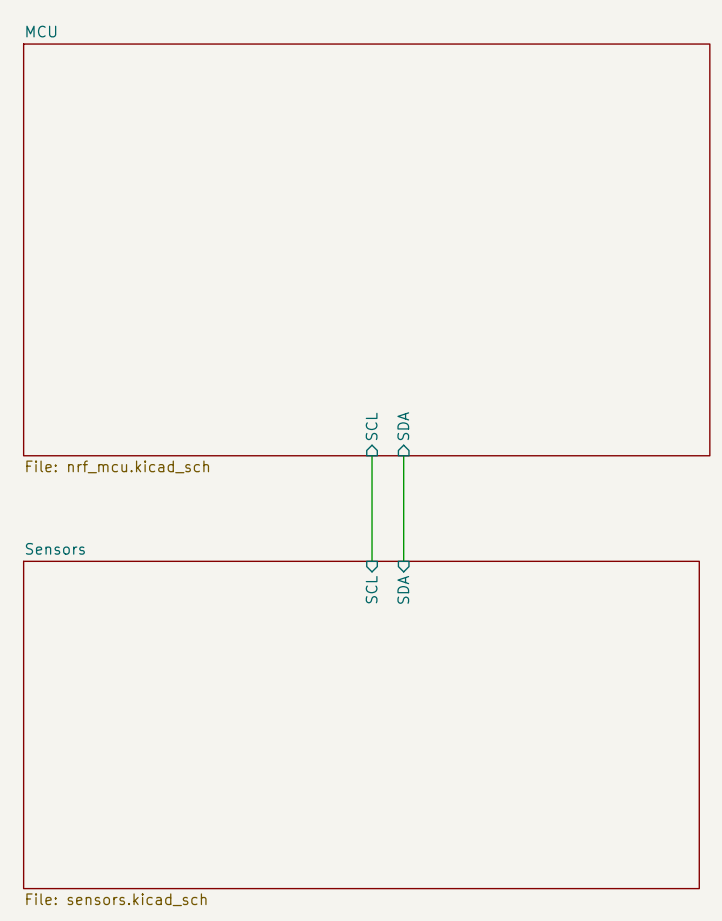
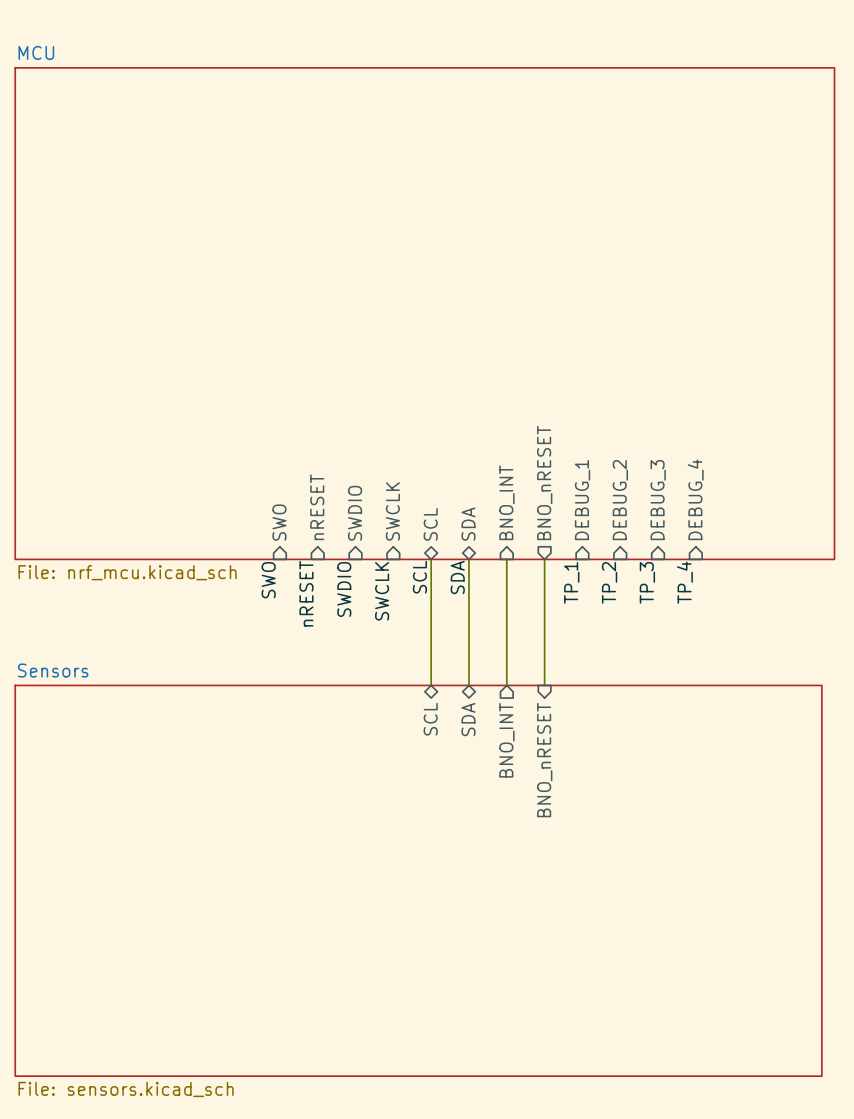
sheet pin: none -> BNO_nRESET (544, 482)
sheet pin: none -> DEBUG_4 (695, 499)
sheet pin: none -> DEBUG_1 (582, 500)
sheet pin: none -> DEBUG_2 (620, 500)
sheet pin: none -> DEBUG_3 (658, 500)
sheet pin: none -> BNO_INT (506, 502)
sheet pin: none -> nRESET (317, 507)
sheet pin: none -> SWCLK (392, 511)
sheet pin: none -> SWDIO (355, 513)
sheet pin: none -> SWO (279, 522)
sheet pin shape: input (371, 426) -> bidirectional (430, 524)
sheet pin shape: input (403, 426) -> bidirectional (468, 524)
wire: none -> (506, 559) (506, 685)
wire: none -> (544, 559) (544, 685)
label: none -> SCL (419, 577)
label: none -> SDA (457, 577)
label: none -> SWO (268, 580)
label: none -> TP_1 (571, 582)
label: none -> TP_2 (609, 582)
label: none -> TP_3 (647, 582)
label: none -> TP_4 (684, 582)
label: none -> SWDIO (344, 589)
label: none -> SWCLK (382, 591)
label: none -> nRESET (306, 593)
sheet pin shape: input (371, 589) -> bidirectional (430, 719)
sheet pin shape: input (403, 589) -> bidirectional (468, 719)
sheet pin: none -> BNO_INT (506, 740)
sheet pin: none -> BNO_nRESET (544, 760)

